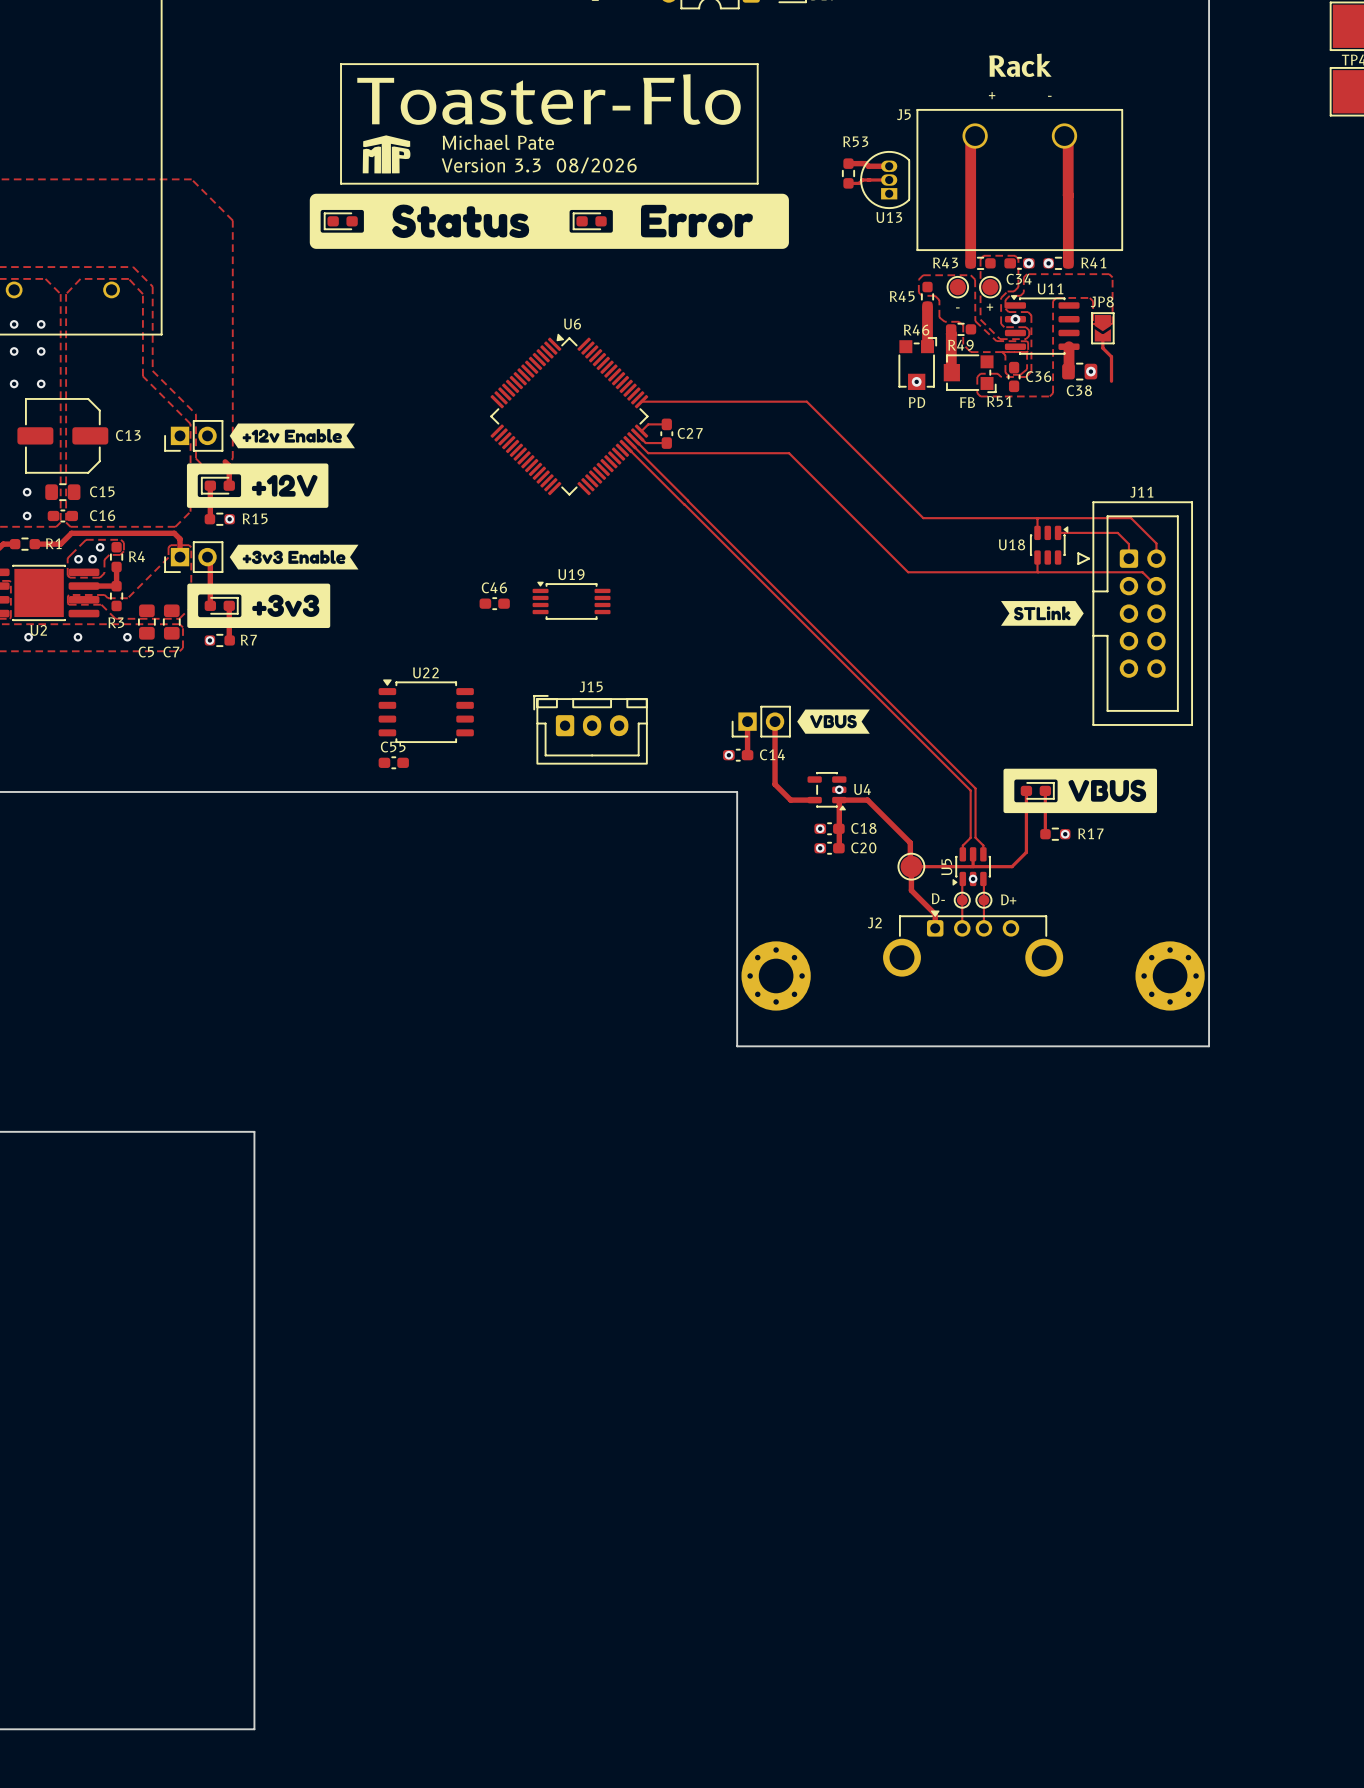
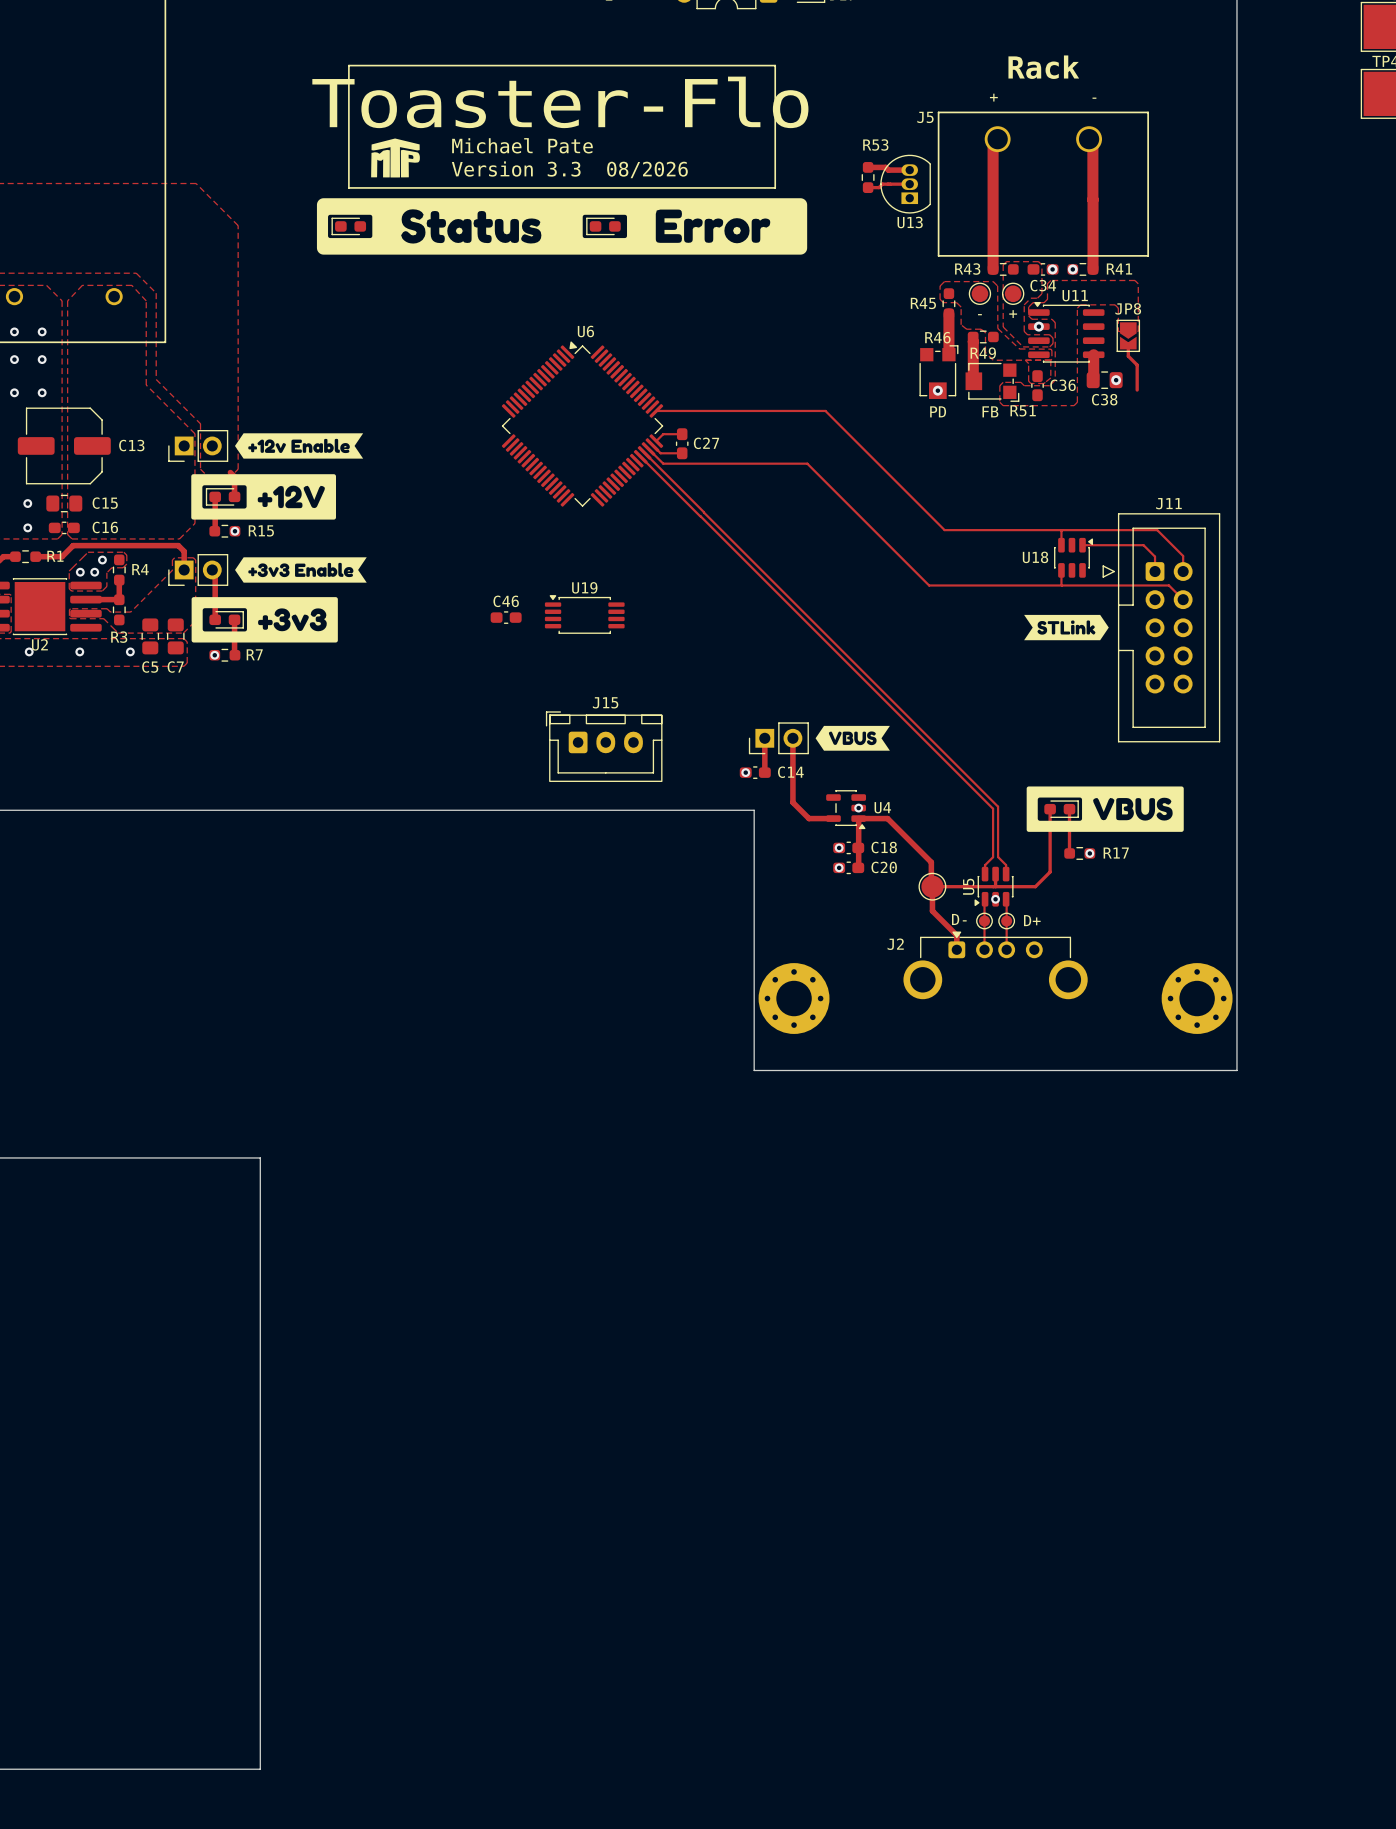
U22: (426, 711) -> none
C55: (393, 762) -> none

